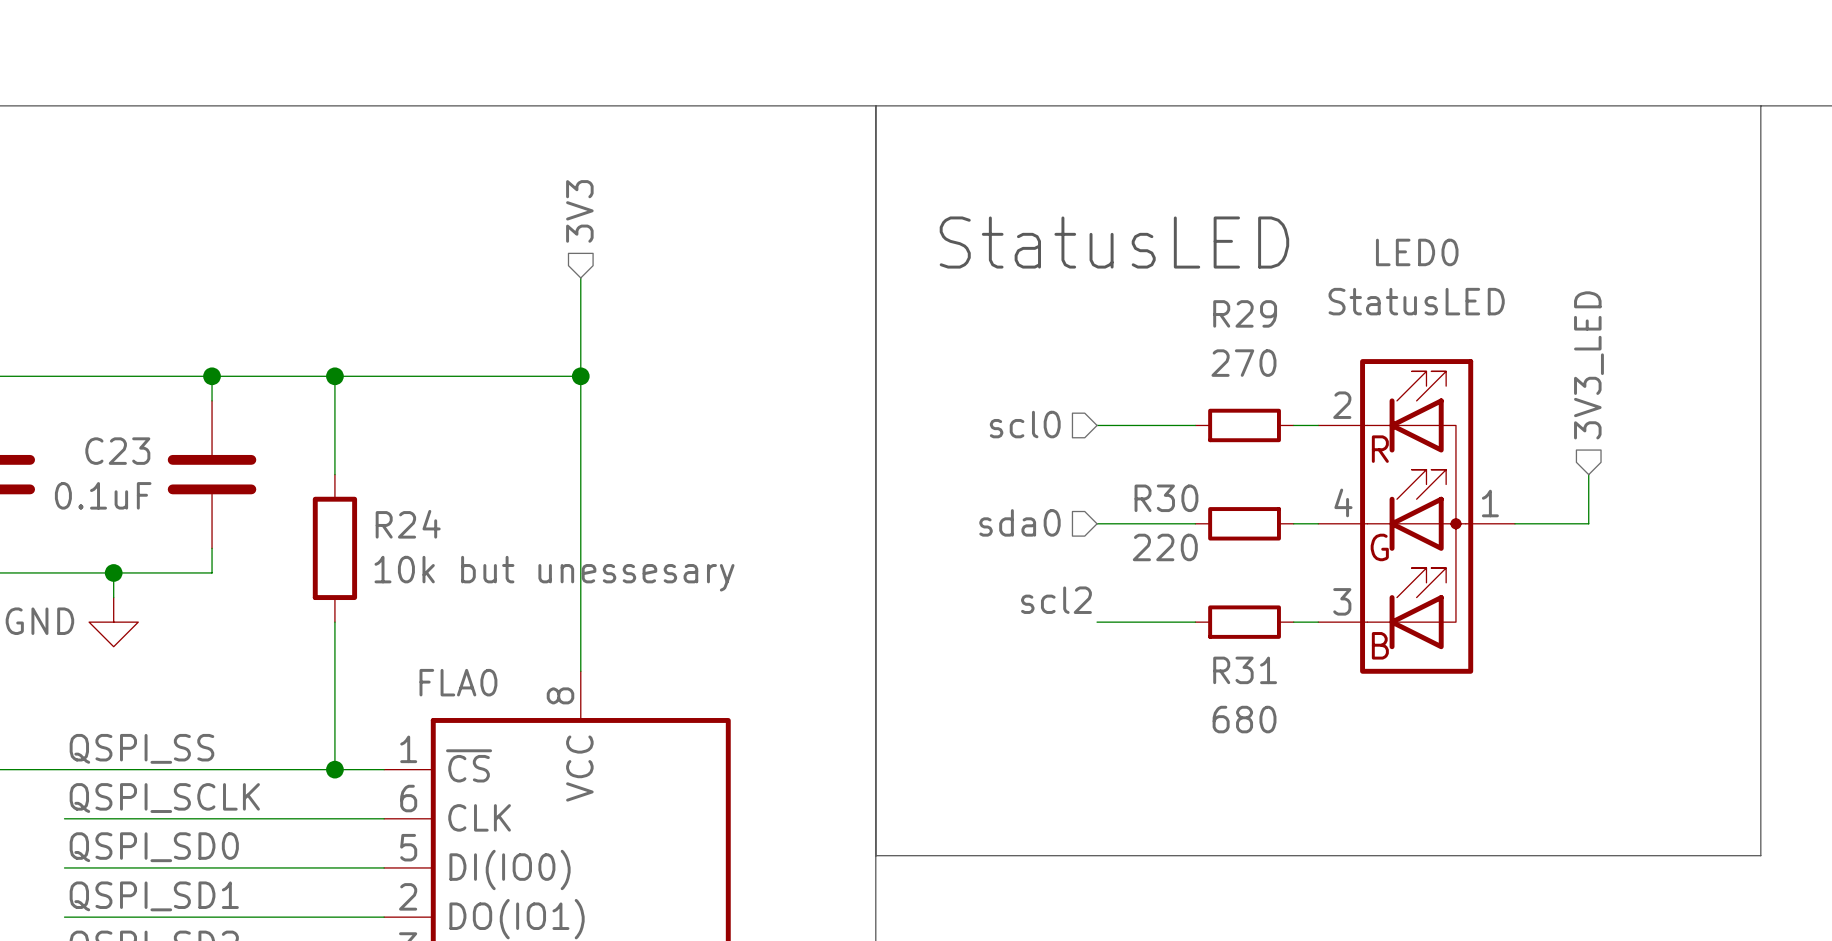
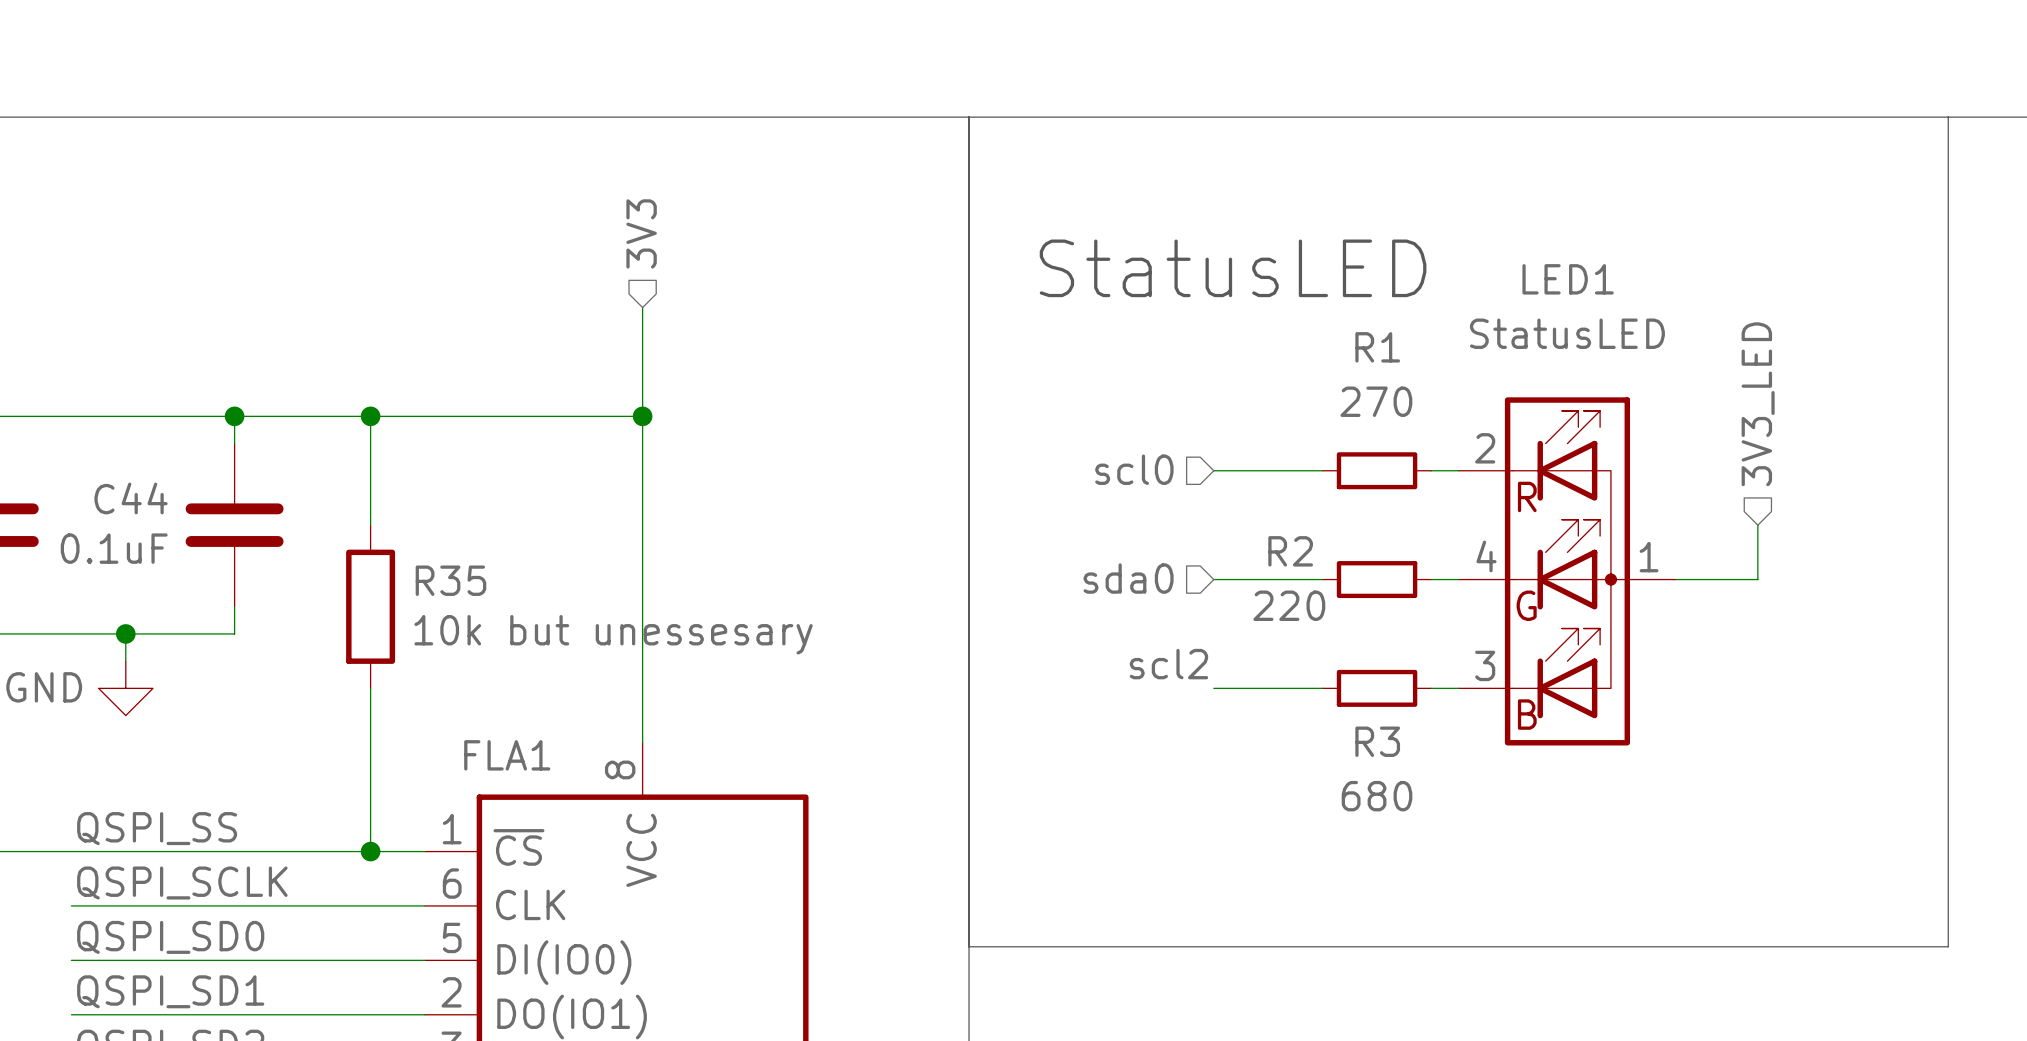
LED0 name: LED0 (1417, 252) -> LED1 (1568, 279)
R29 name: R29 (1245, 313) -> R1 (1377, 347)
C23 name: C23 (117, 451) -> C44 (131, 498)
R30 name: R30 (1166, 498) -> R2 (1290, 551)
R24 name: R24 (408, 524) -> R35 (450, 580)
R31 name: R31 (1245, 670) -> R3 (1377, 741)
FLA0 name: FLA0 (458, 682) -> FLA1 (507, 755)

